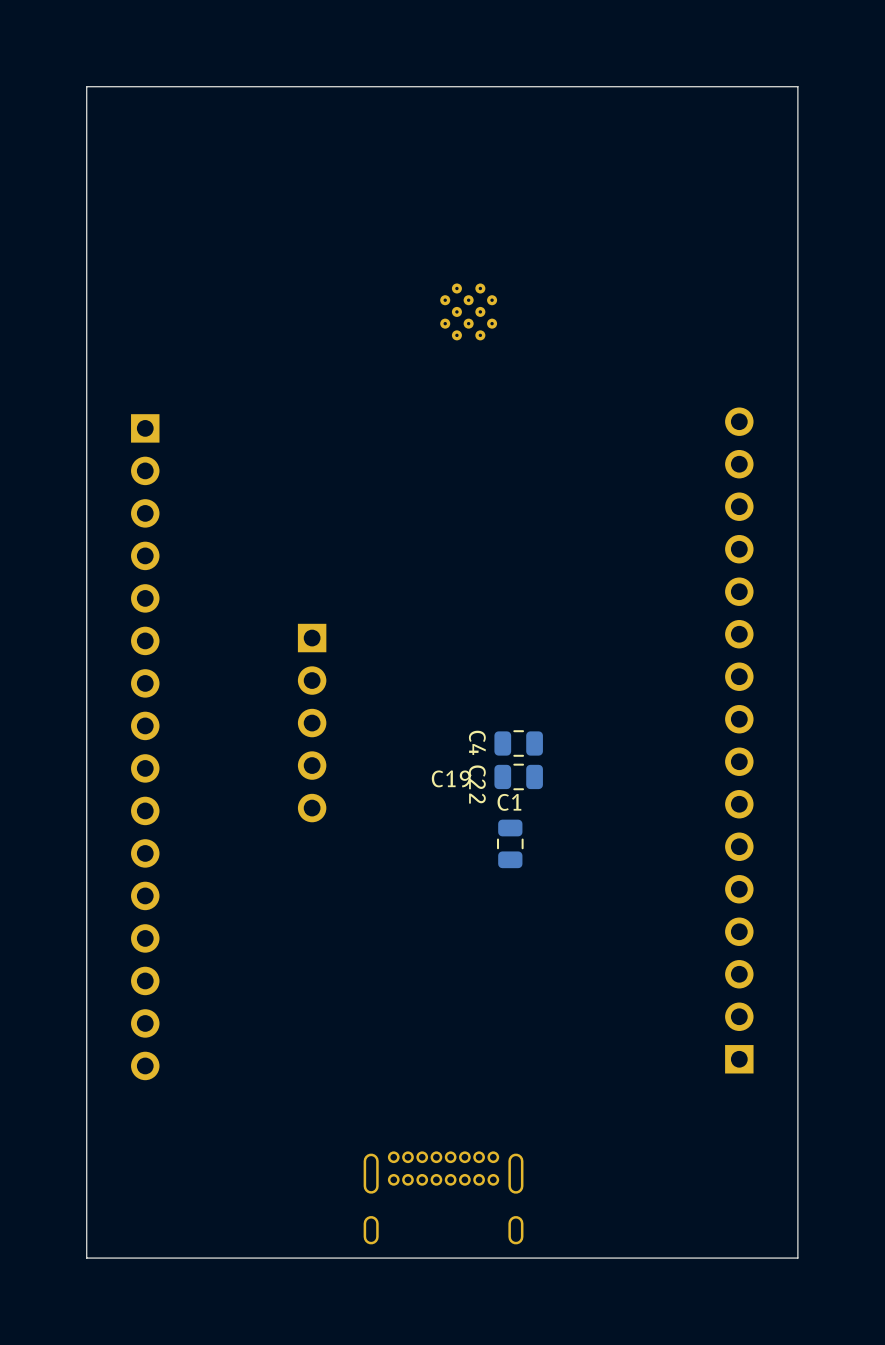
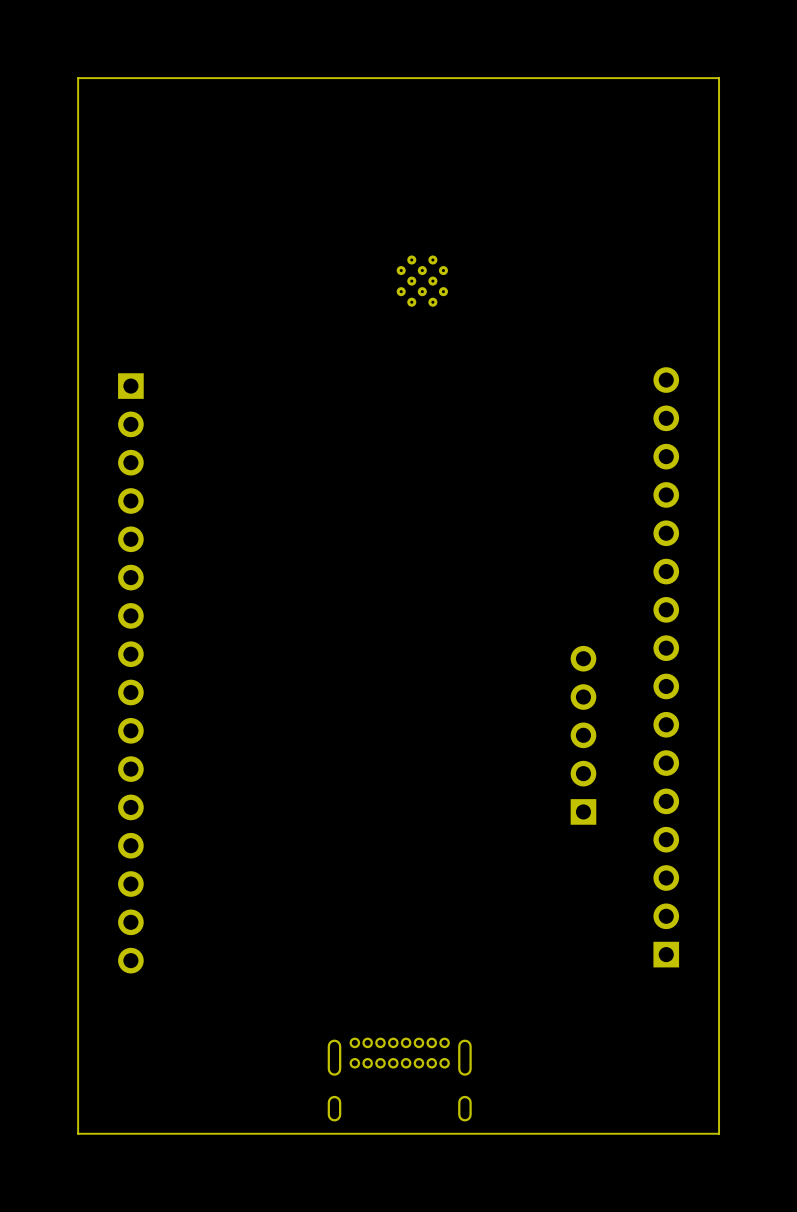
part rotation: 0° (312, 723) -> 180° (583, 735)
part position: (312, 723) -> (583, 735)
C4: (518, 743) -> none
C22: (518, 776) -> none
C19: (451, 778) -> none
C1: (510, 843) -> none

